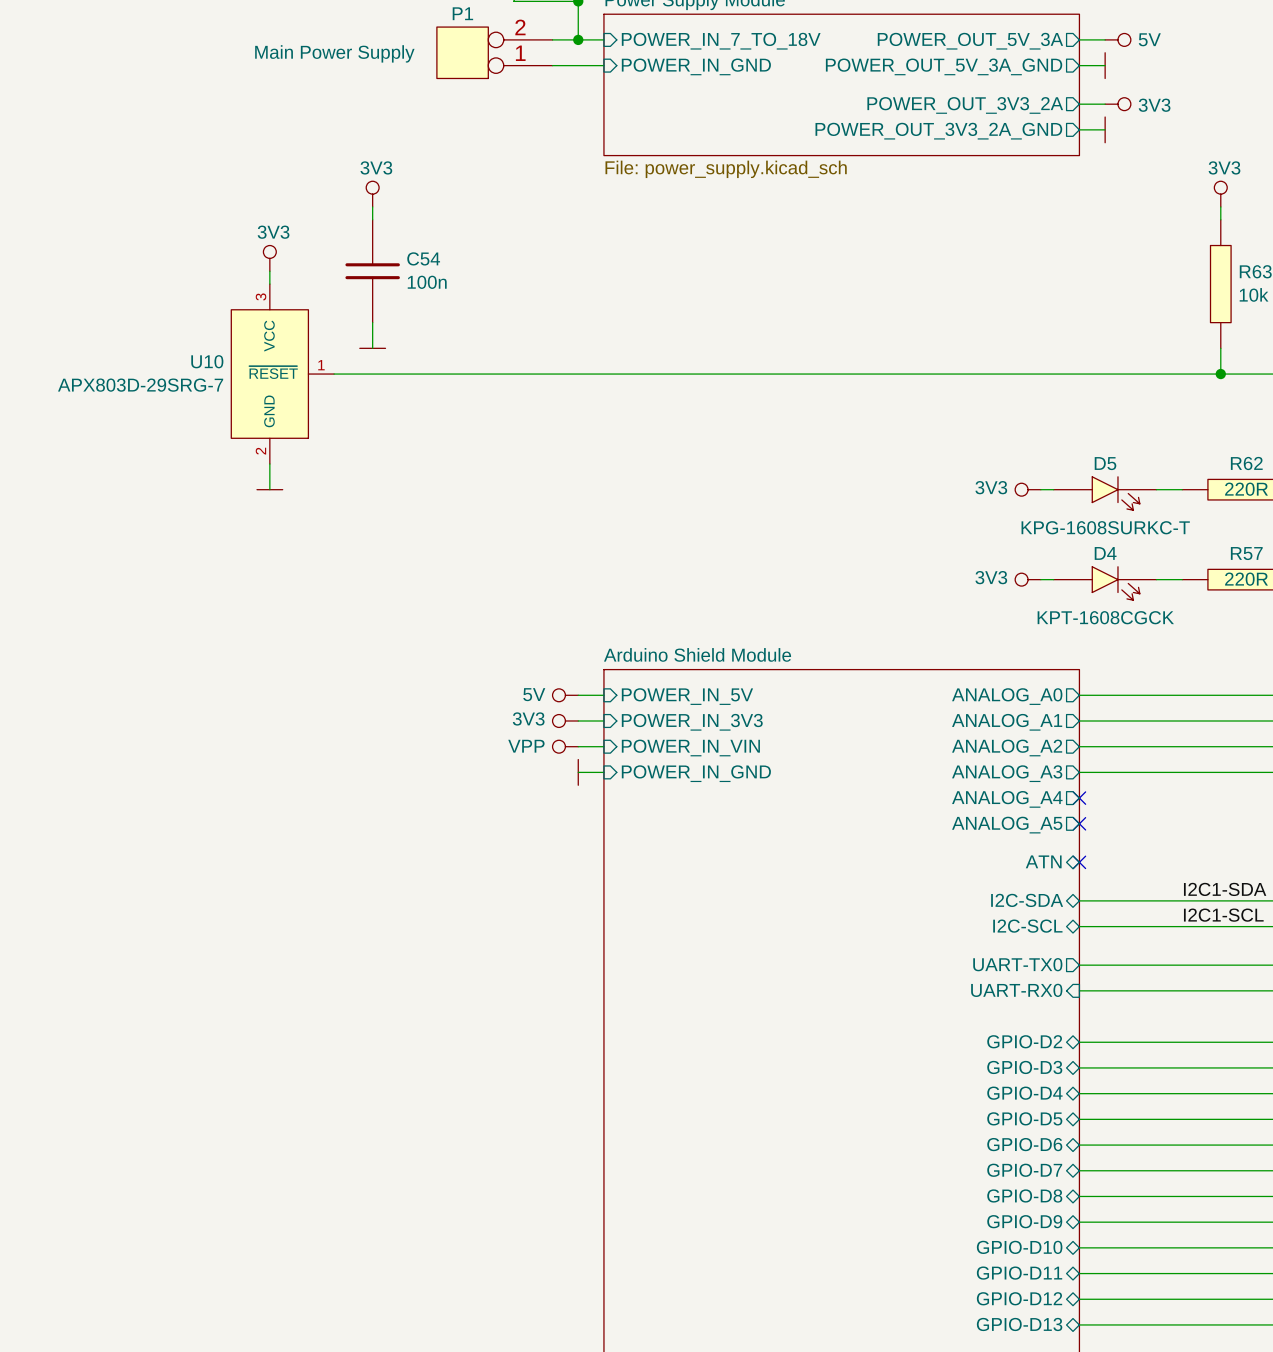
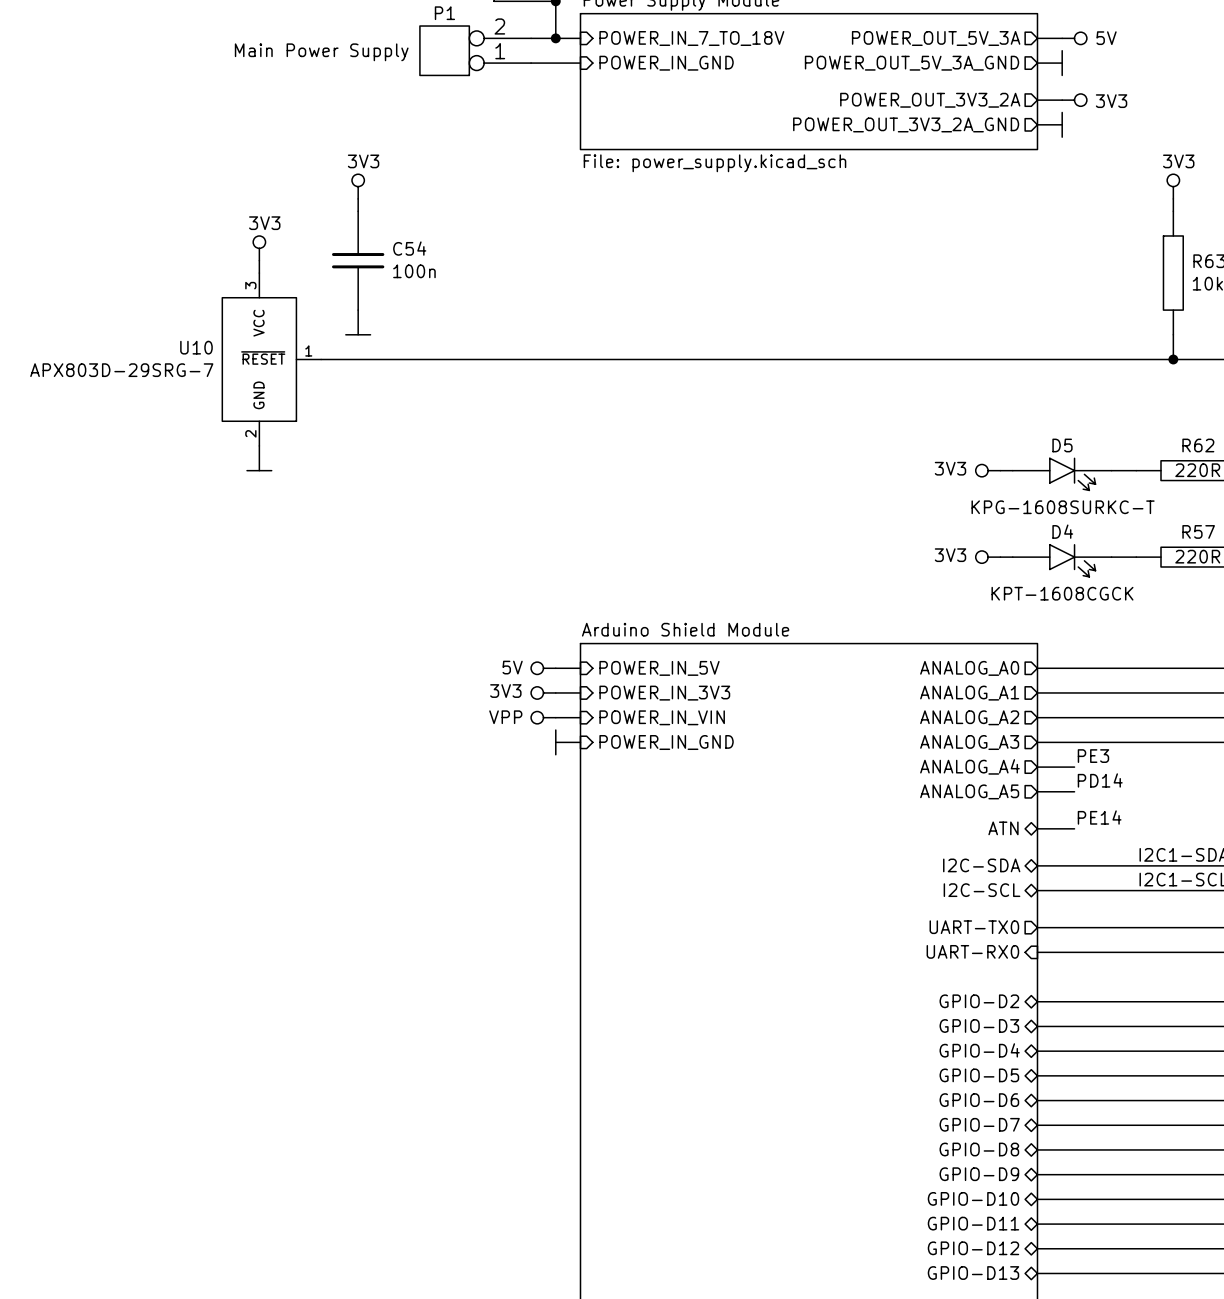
label: none -> PE3 (1093, 756)
wire: none -> (1037, 767) (1074, 767)
no-connect mark: (1079, 798) -> none
label: none -> PD14 (1100, 780)
wire: none -> (1037, 791) (1074, 791)
no-connect mark: (1079, 823) -> none
label: none -> PE14 (1099, 817)
wire: none -> (1037, 828) (1074, 828)
no-connect mark: (1079, 862) -> none

